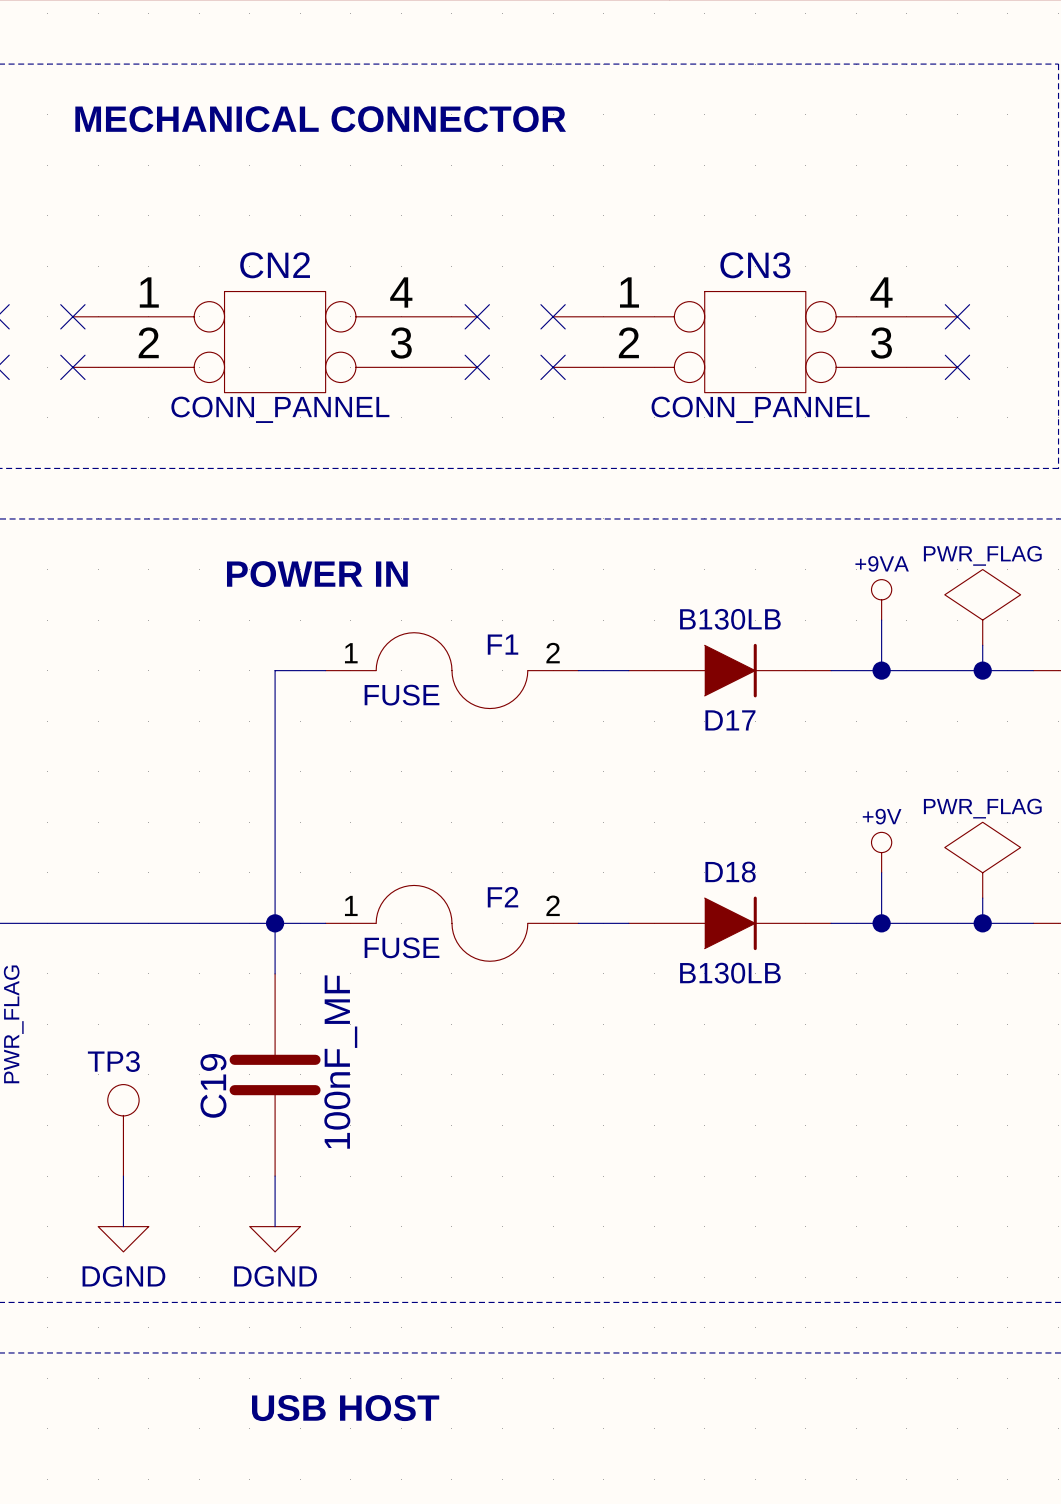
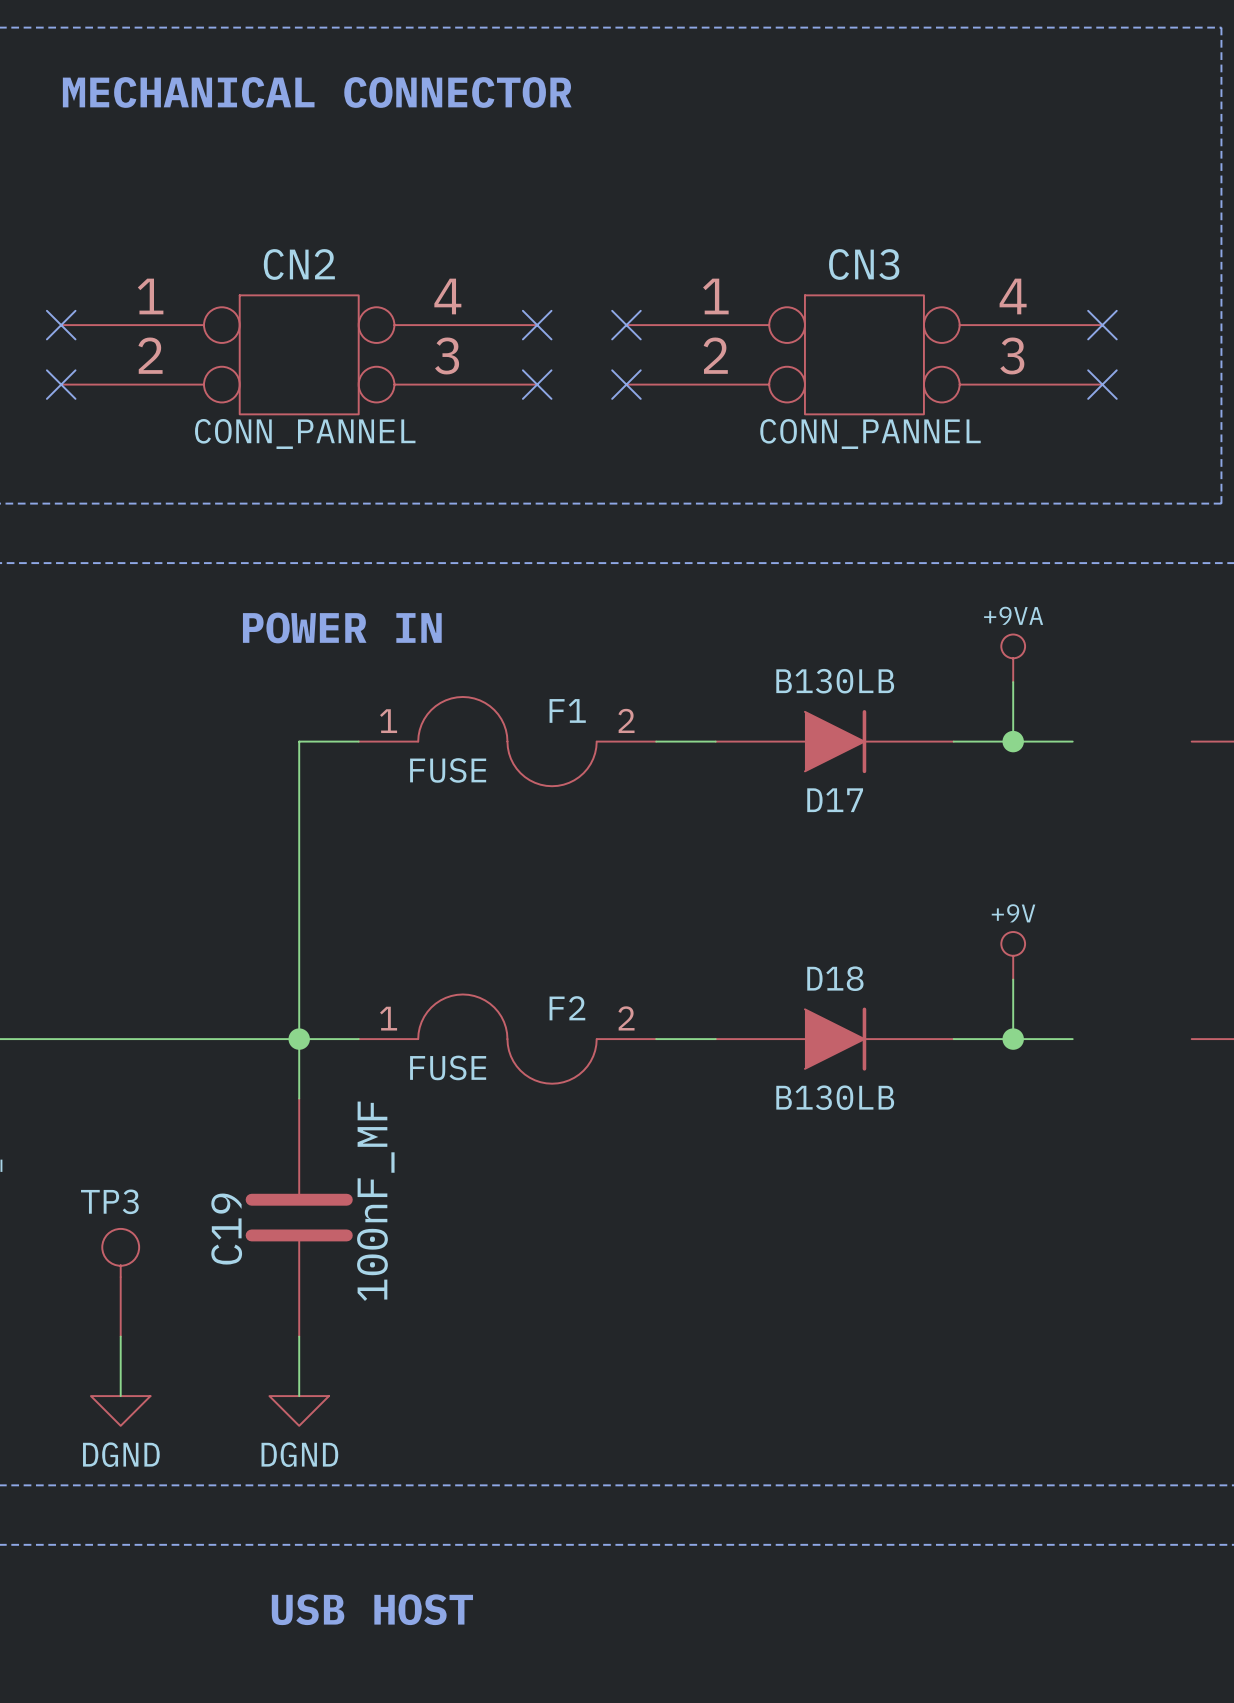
power symbol: PWR_FLAG (982, 607) -> none
wire: (982, 645) (982, 670) -> none
wire: (932, 670) (1033, 670) -> none
junction: (982, 670) -> none
power symbol: PWR_FLAG (982, 860) -> none
wire: (982, 898) (982, 923) -> none
wire: (932, 923) (1033, 923) -> none
junction: (982, 923) -> none

